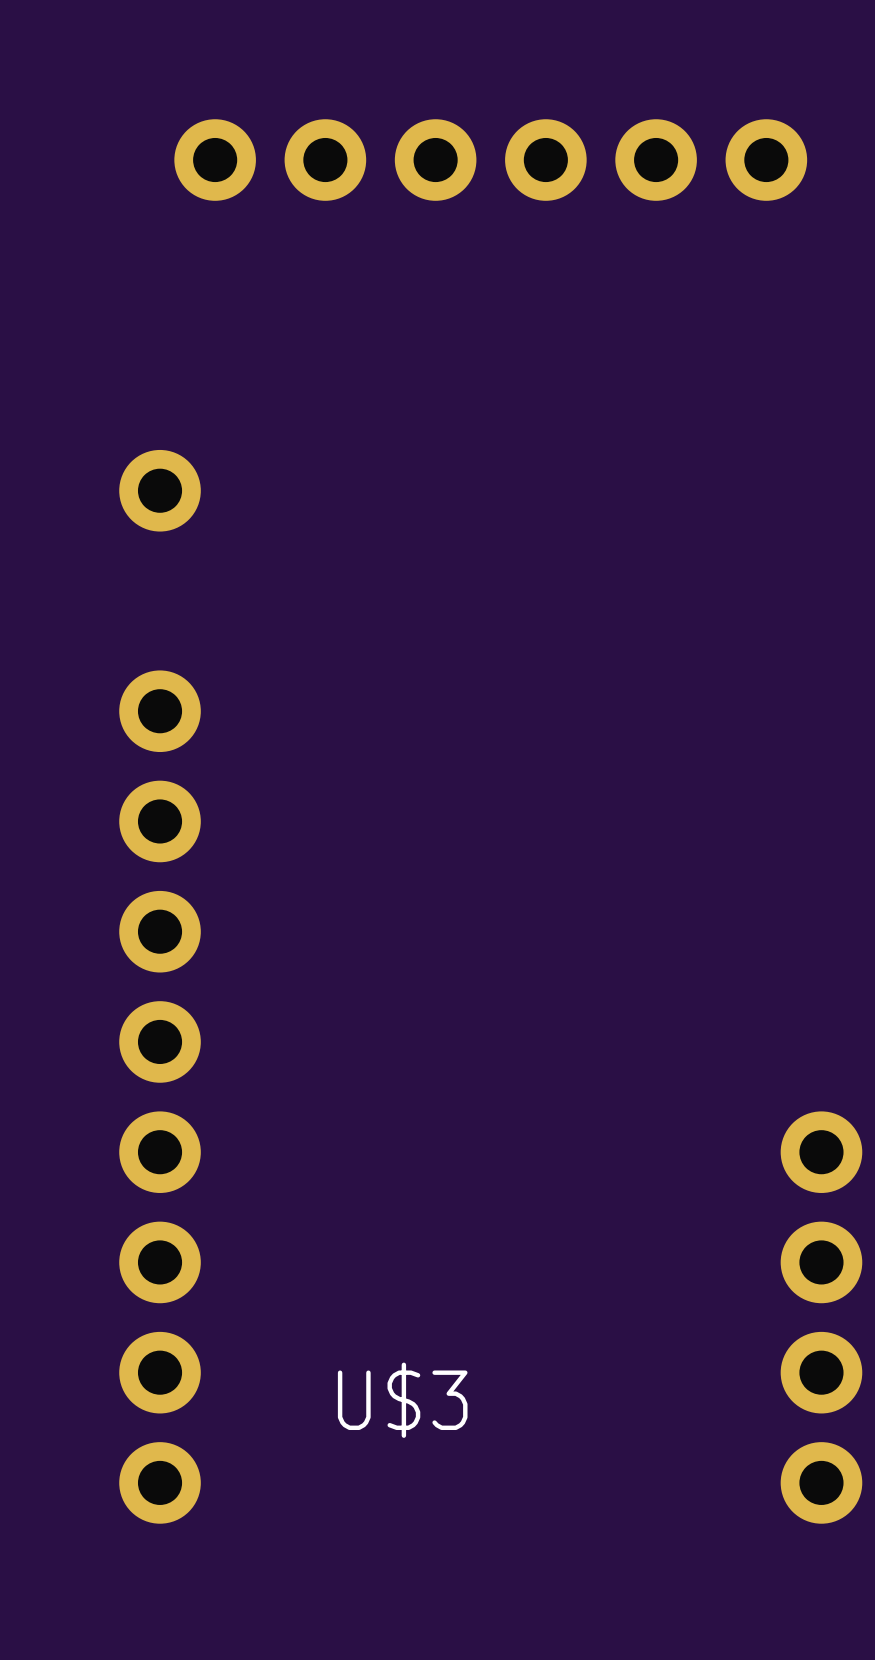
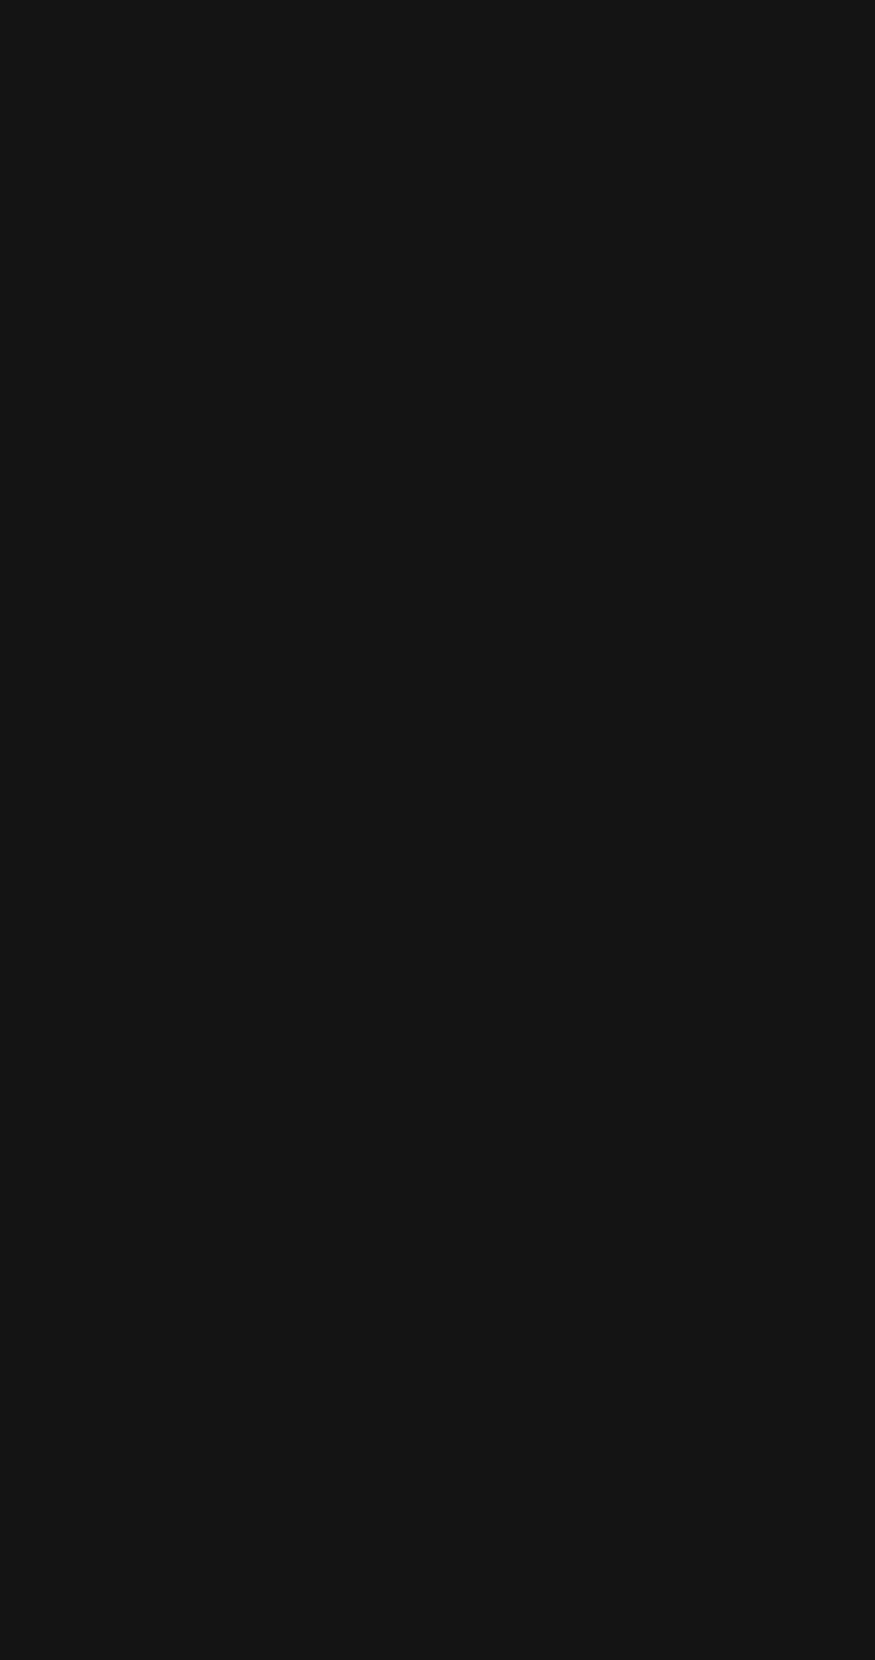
U$3: (490, 821) -> none

